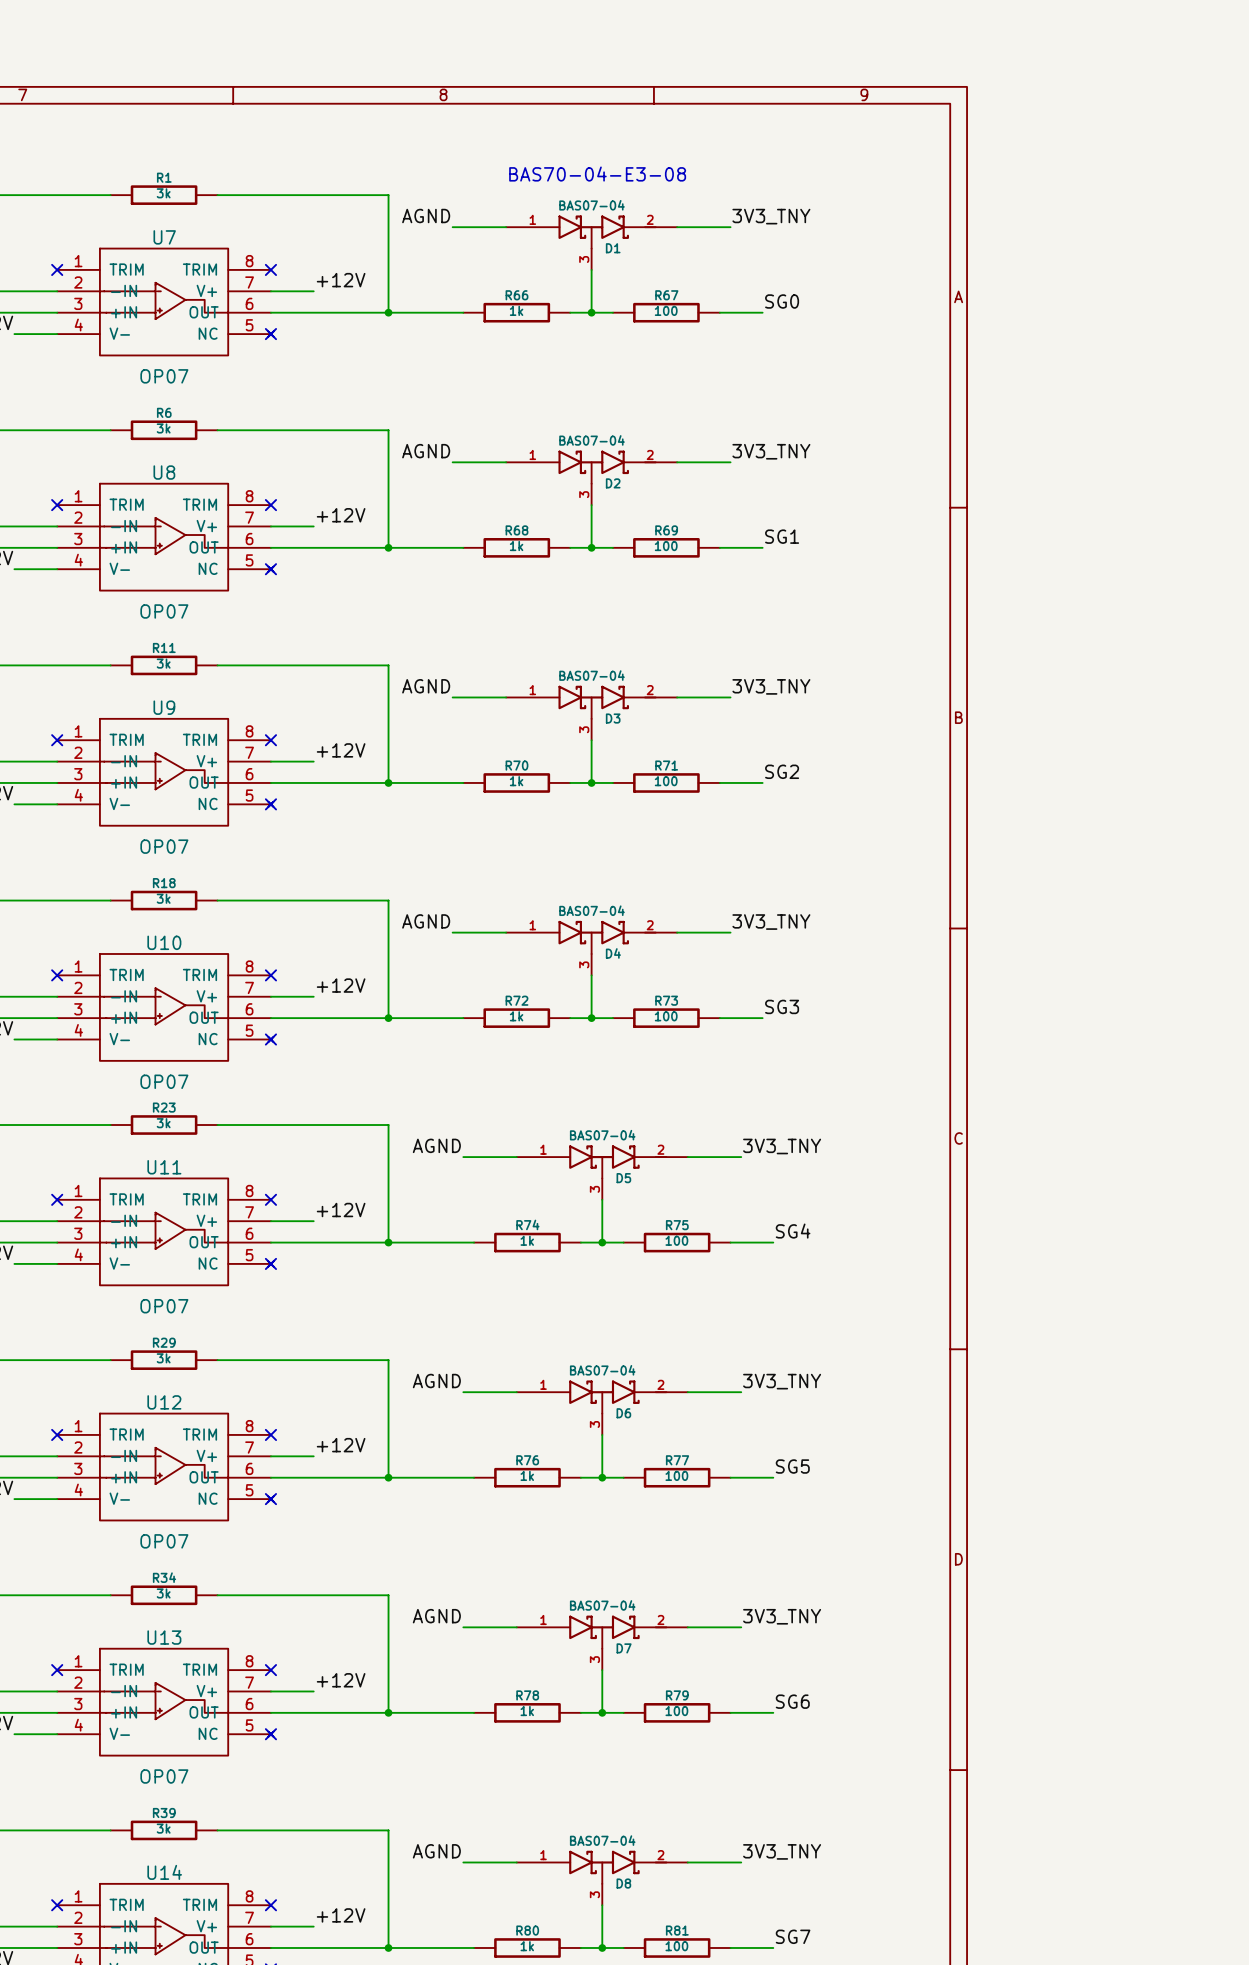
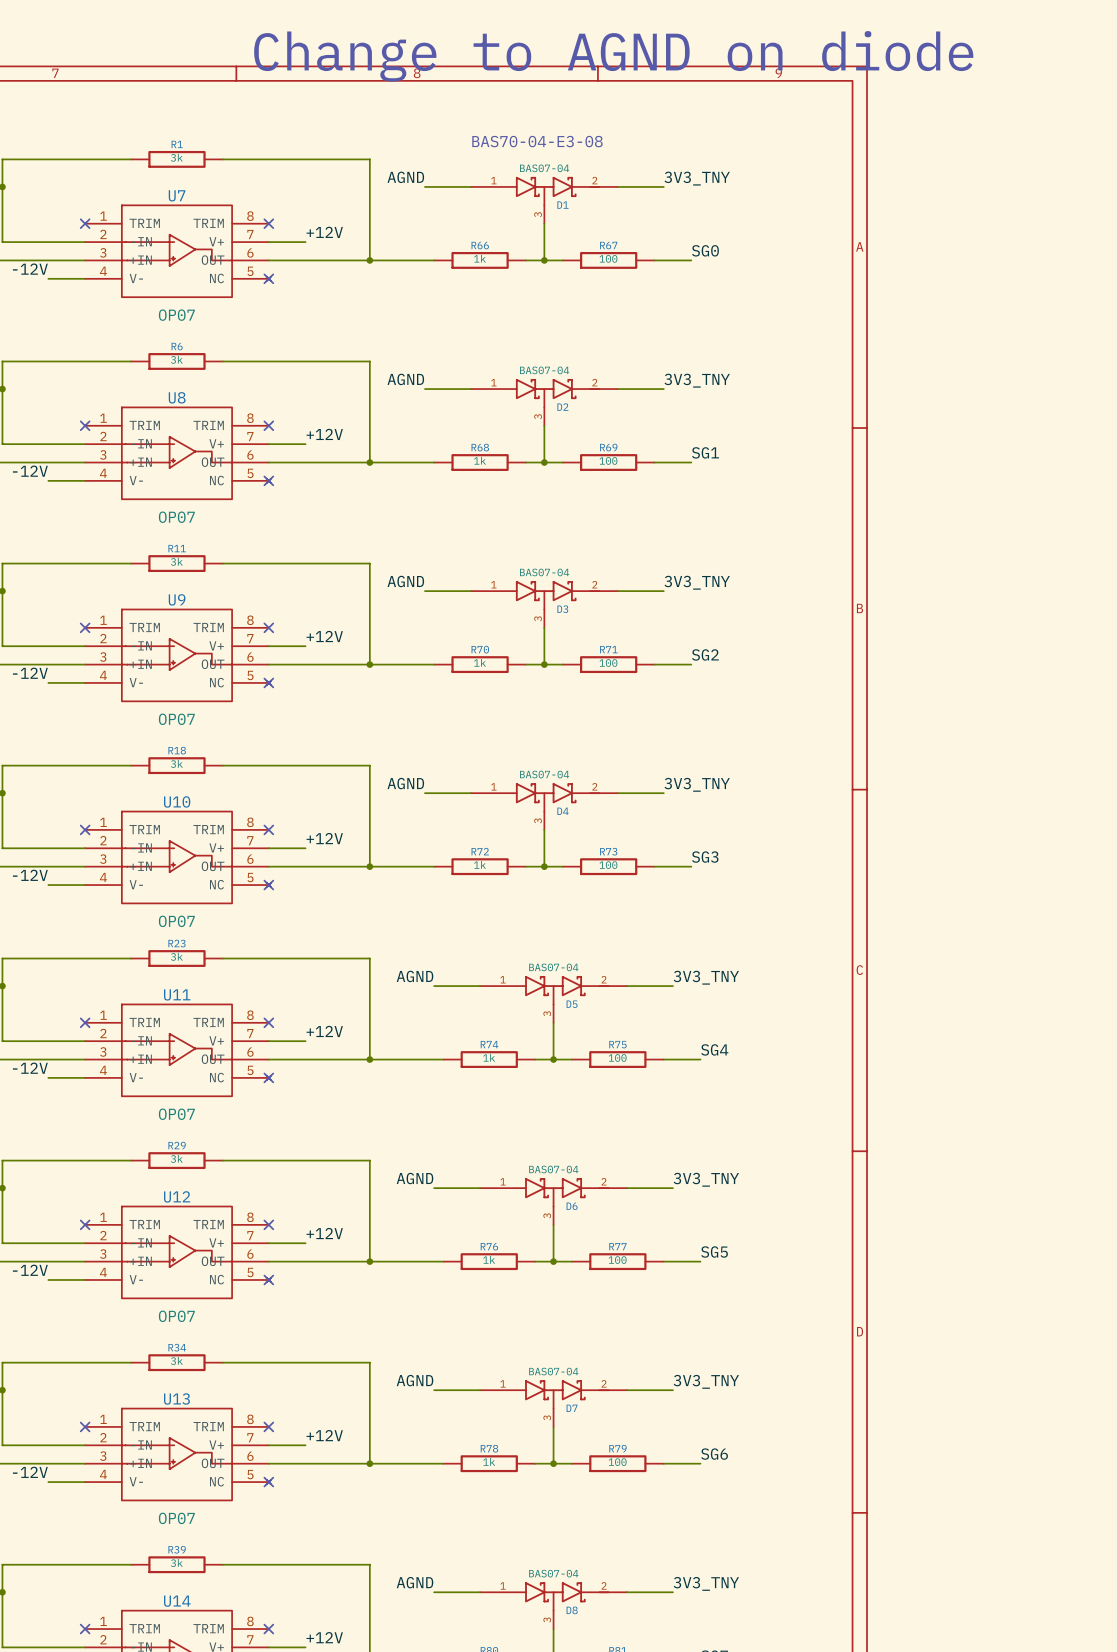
text: none -> Change to AGND on diode (613, 56)

